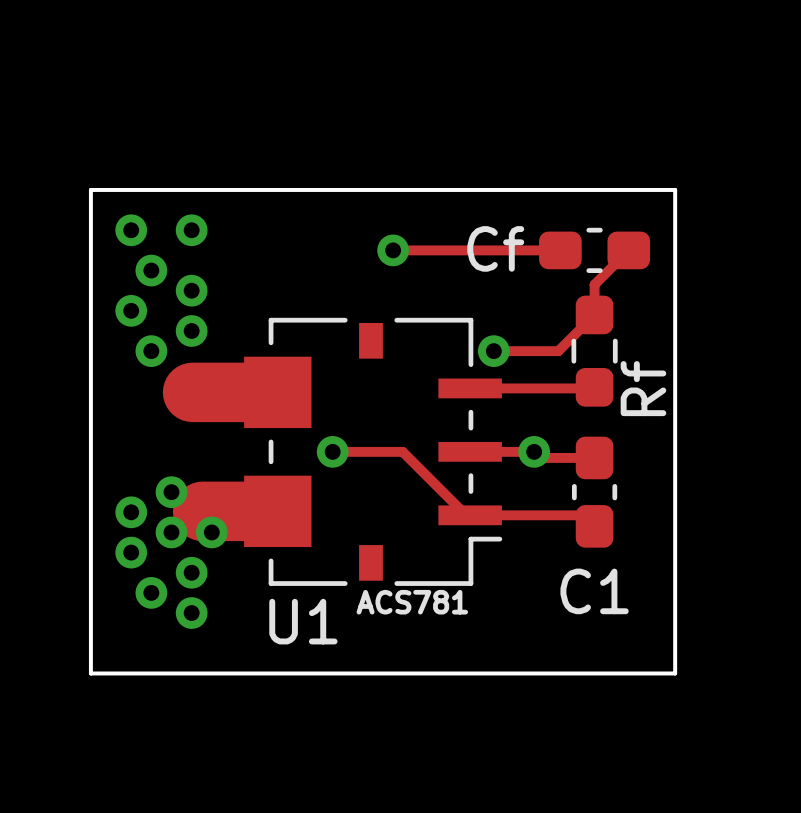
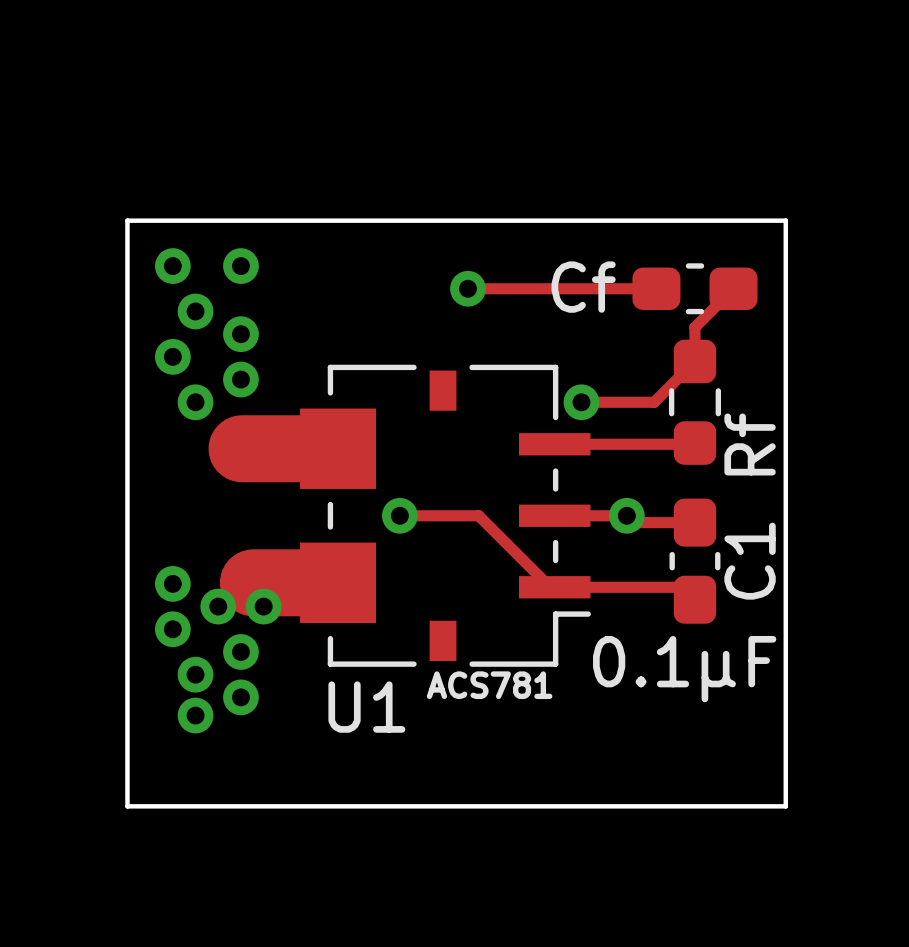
via position: (171, 492) -> (195, 715)
text: none -> 0.1μF (684, 669)
C1 name rotation: 0° (594, 591) -> 90° counterclockwise (750, 561)
C1 name position: C1 (594, 591) -> C1 (750, 561)
board edge: (90, 673) (675, 673) -> (127, 765) (127, 806) (785, 806) (785, 765)

